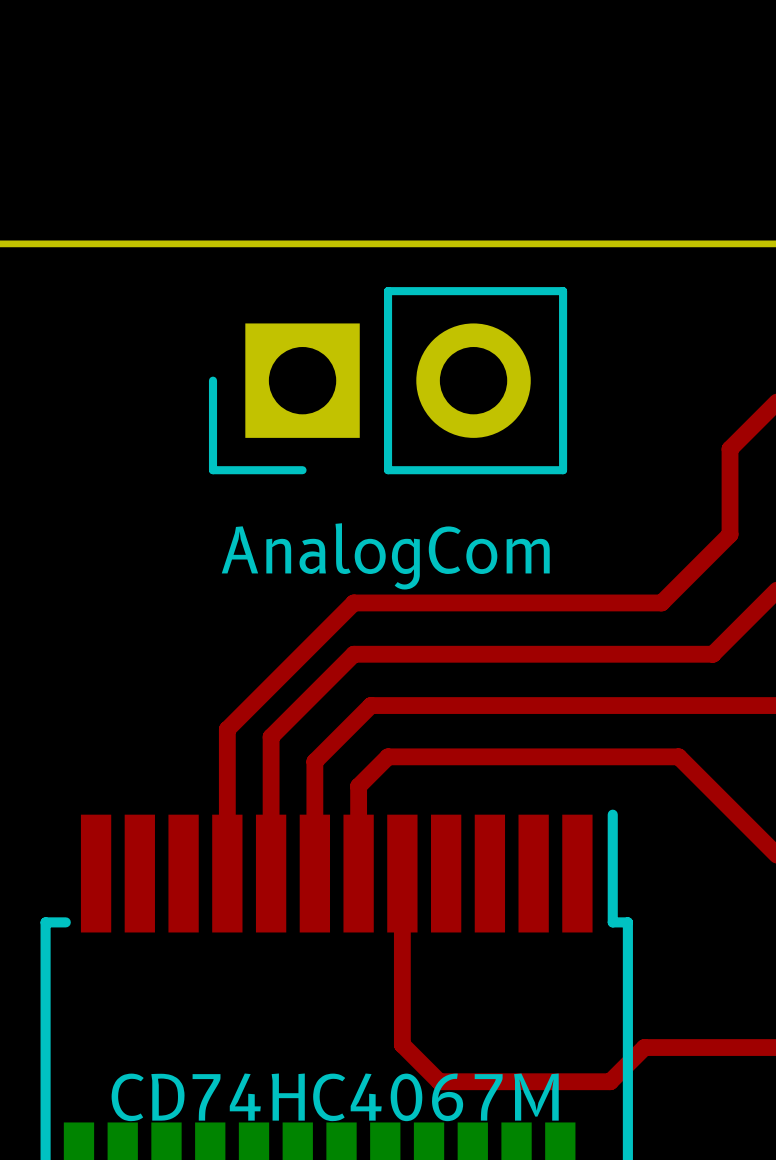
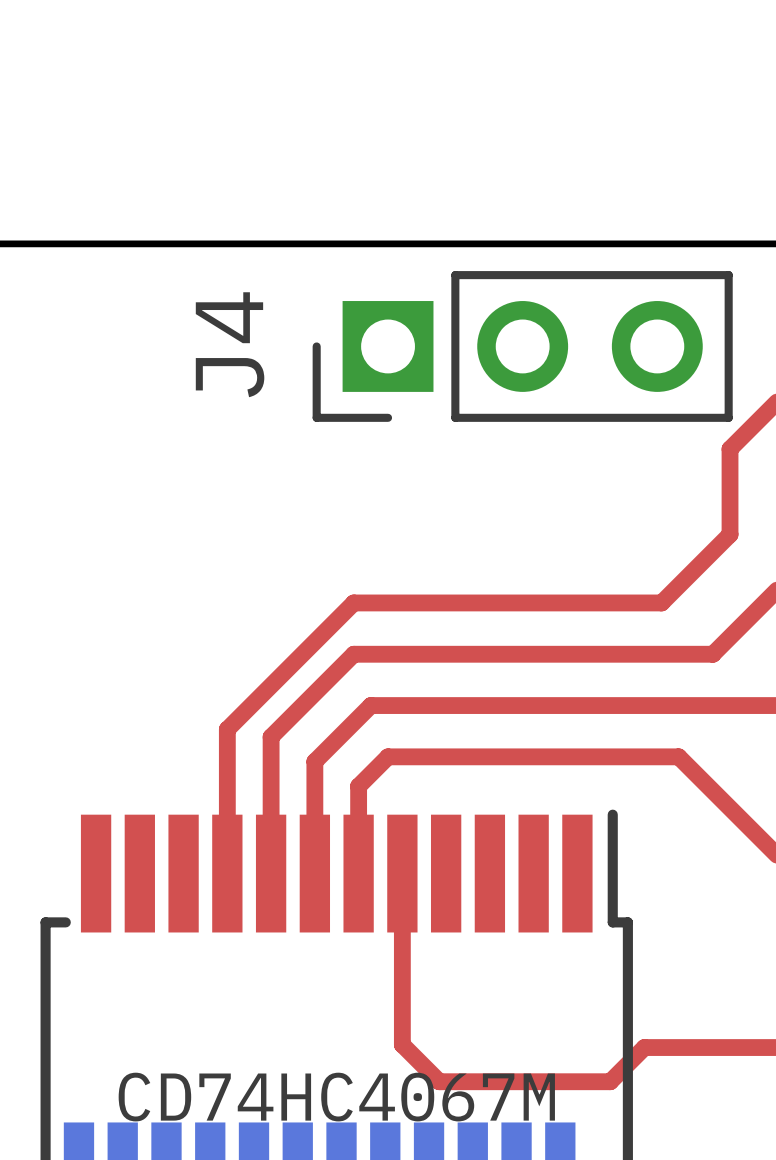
J4: none -> (522, 346)
part: AnalogCom (388, 380) -> none

